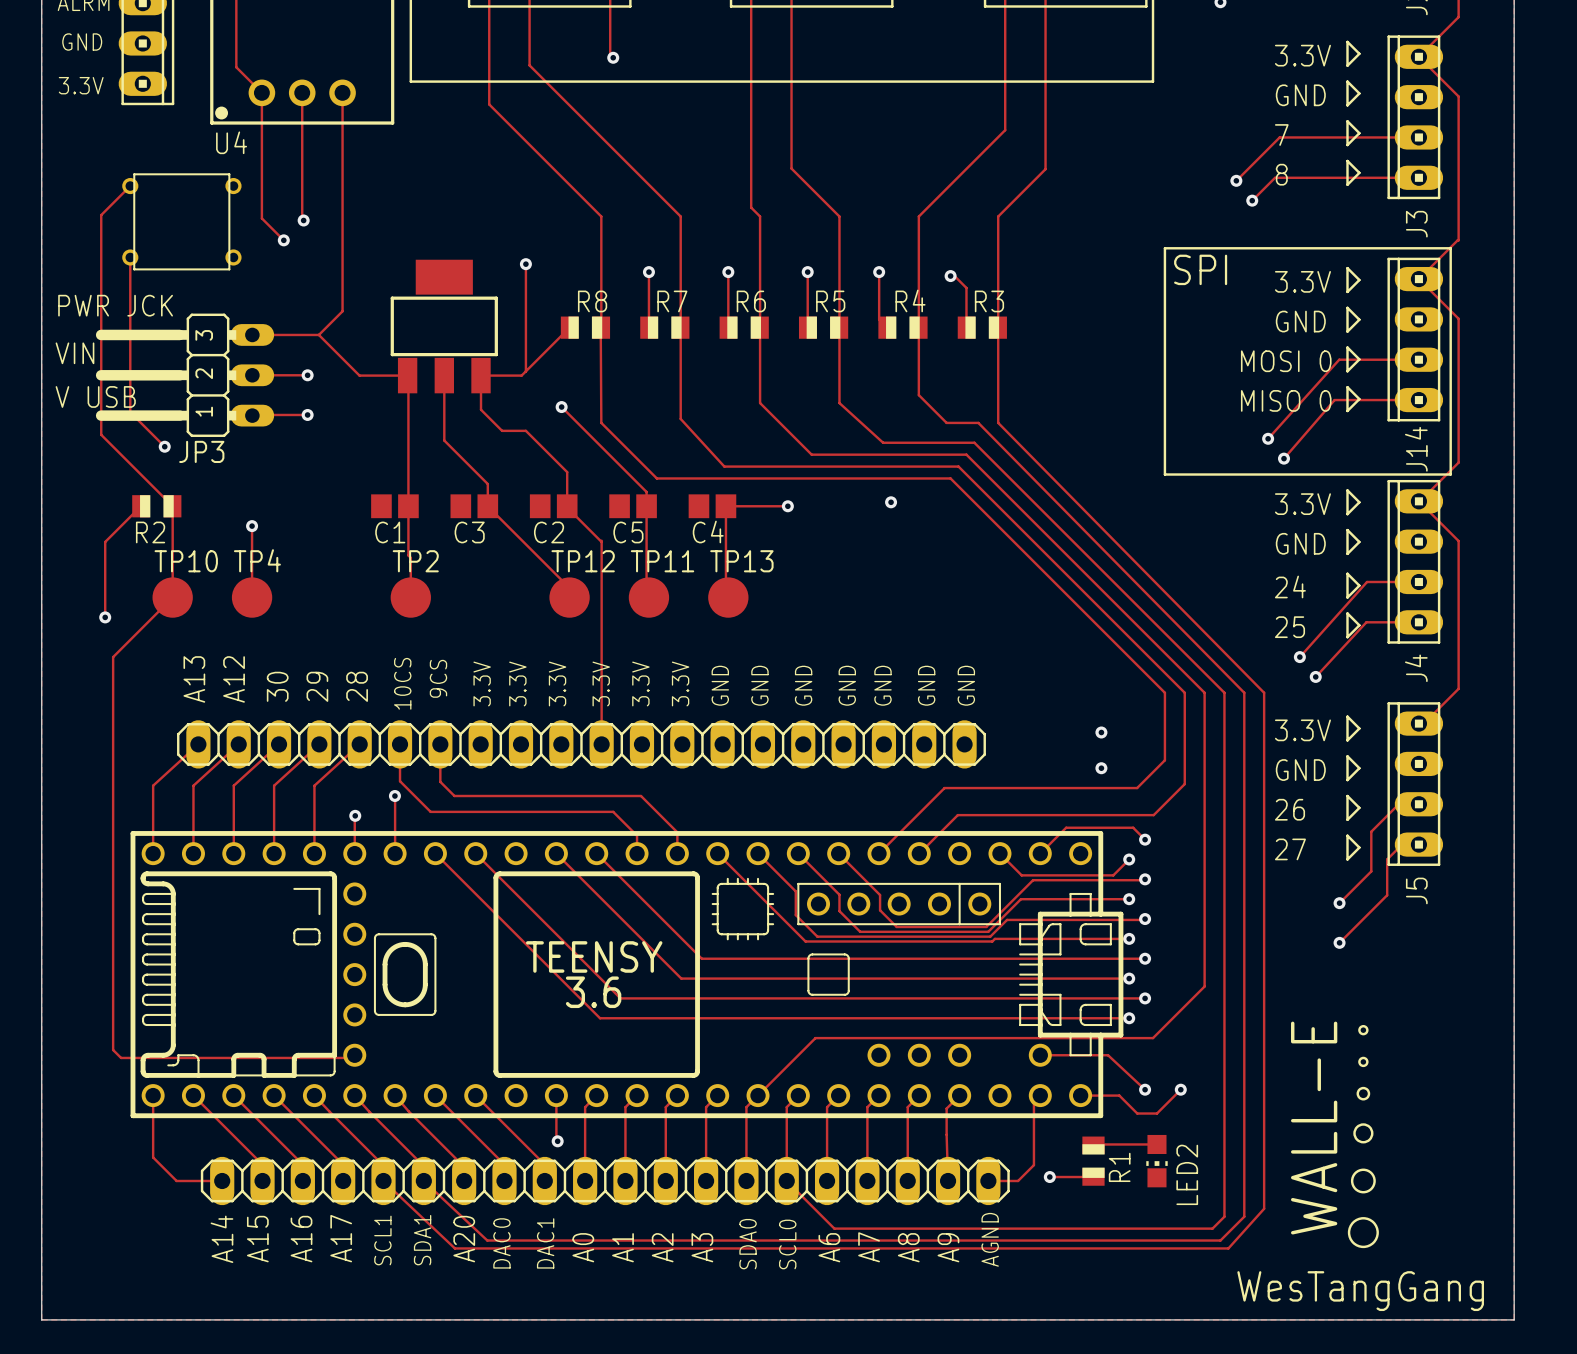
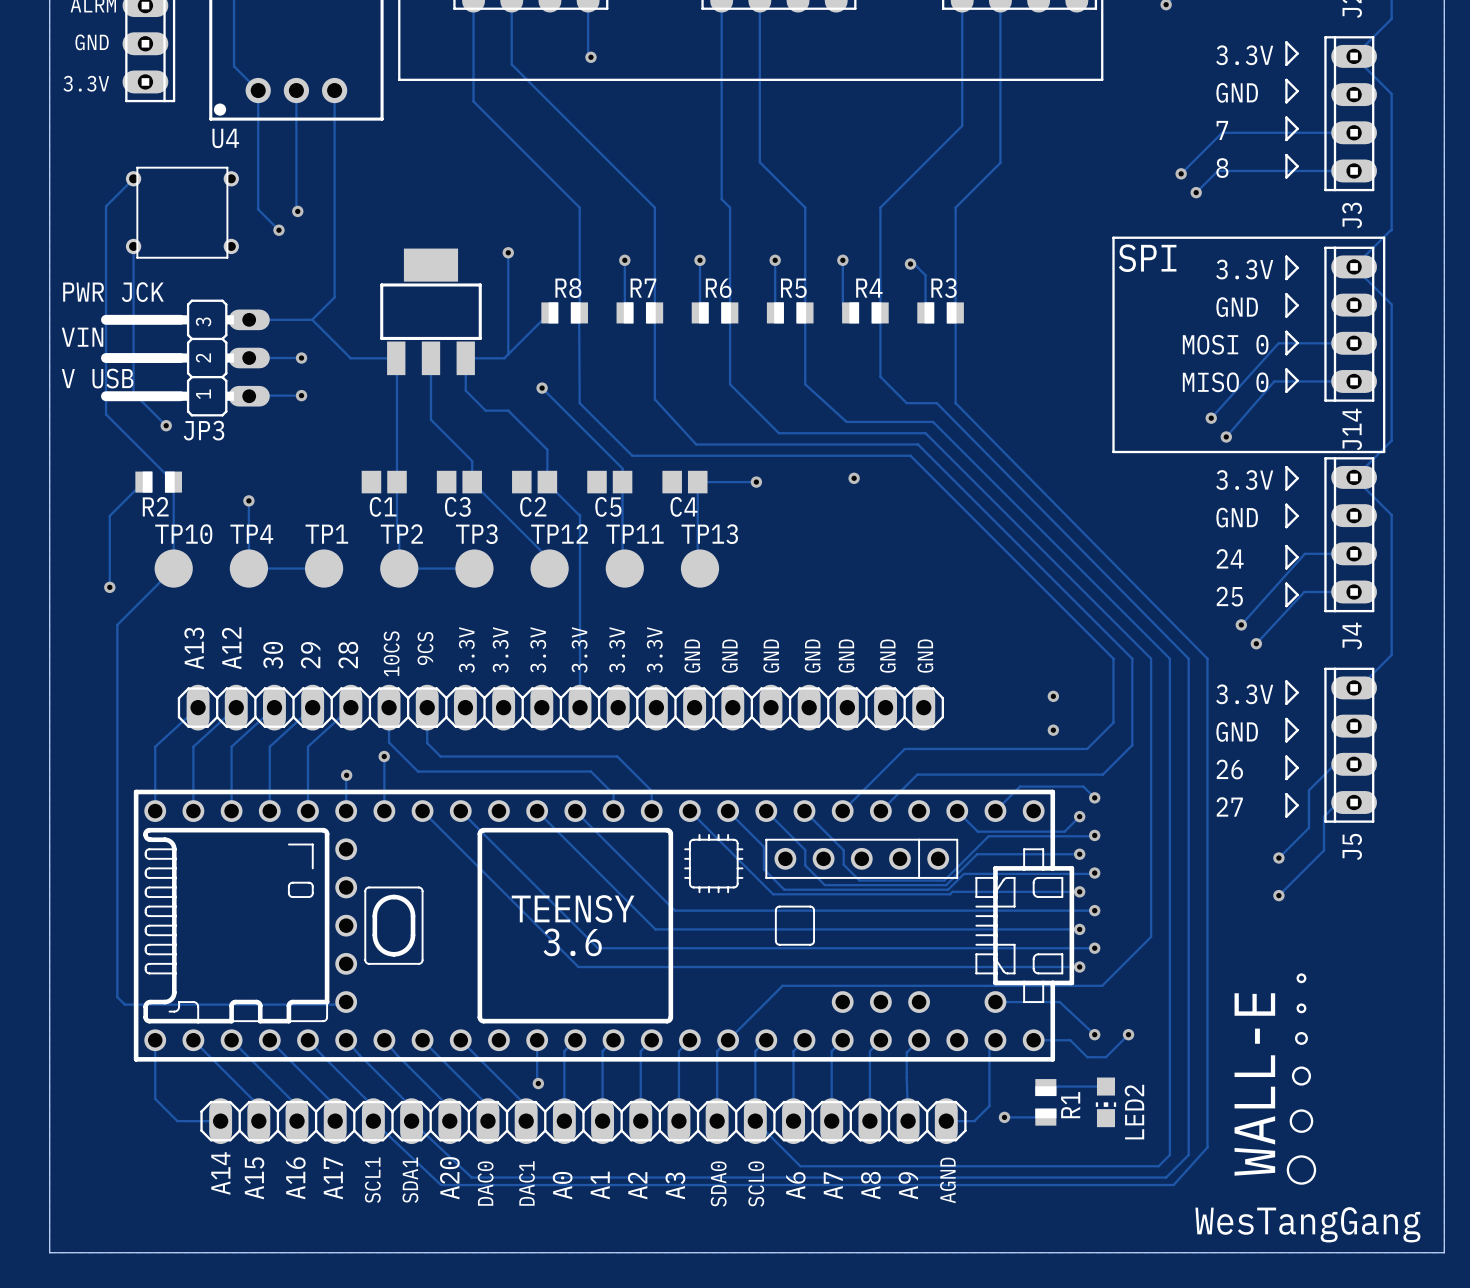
track: none -> (248, 568) (324, 568)
TP1: none -> (324, 568)
track: none -> (399, 568) (474, 568)
TP3: none -> (474, 568)

